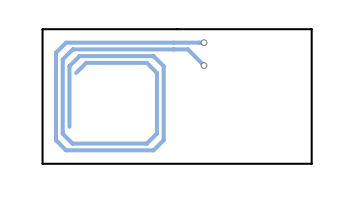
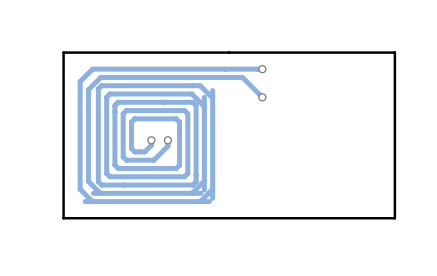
track: (79, 56) (69, 66) (69, 126) -> (109, 85) (101, 85) (98, 88) (98, 181) (101, 185) (192, 185) (196, 181) (196, 105) (192, 102) (118, 102) (114, 105) (114, 165) (118, 168) (176, 168) (179, 165) (179, 122) (176, 118) (134, 118) (131, 122) (131, 148) (134, 151) (144, 151) (151, 145) (151, 140)
track: (86, 62) (76, 72) -> (117, 94) (109, 94) (106, 97) (106, 173) (109, 176) (184, 176) (187, 173) (187, 113) (184, 110) (126, 110) (123, 113) (123, 156) (126, 160) (153, 160) (167, 146) (167, 140)
via: none -> (151, 140)
via: none -> (167, 140)

